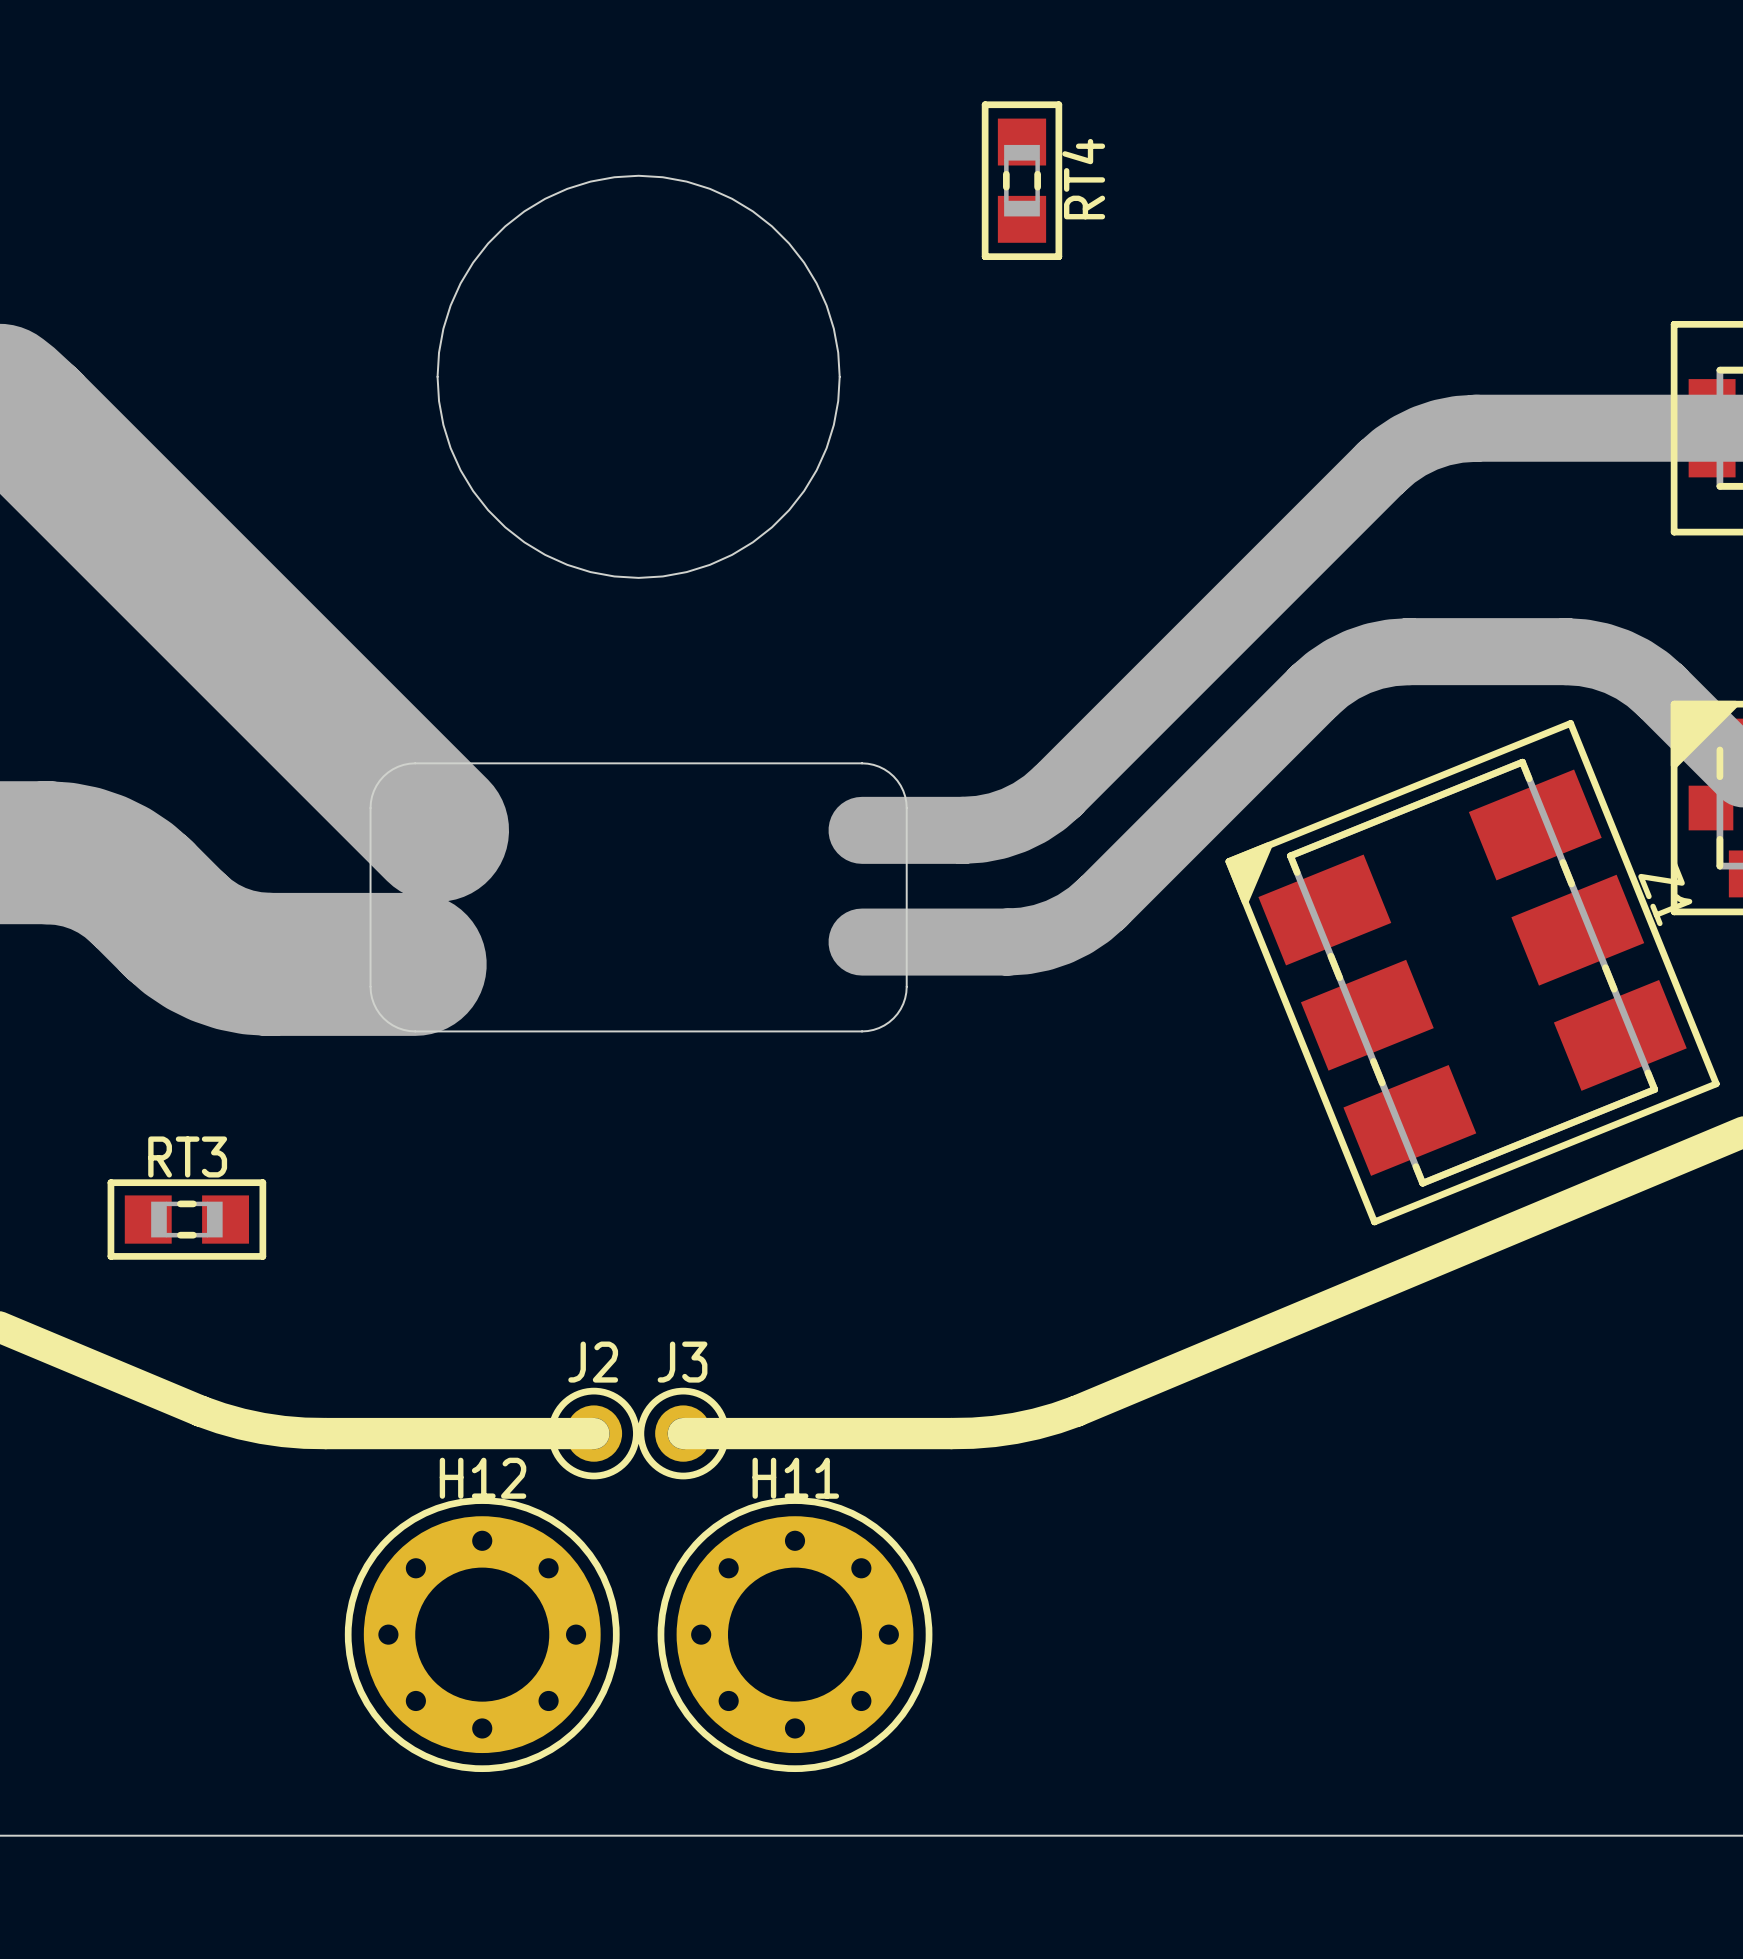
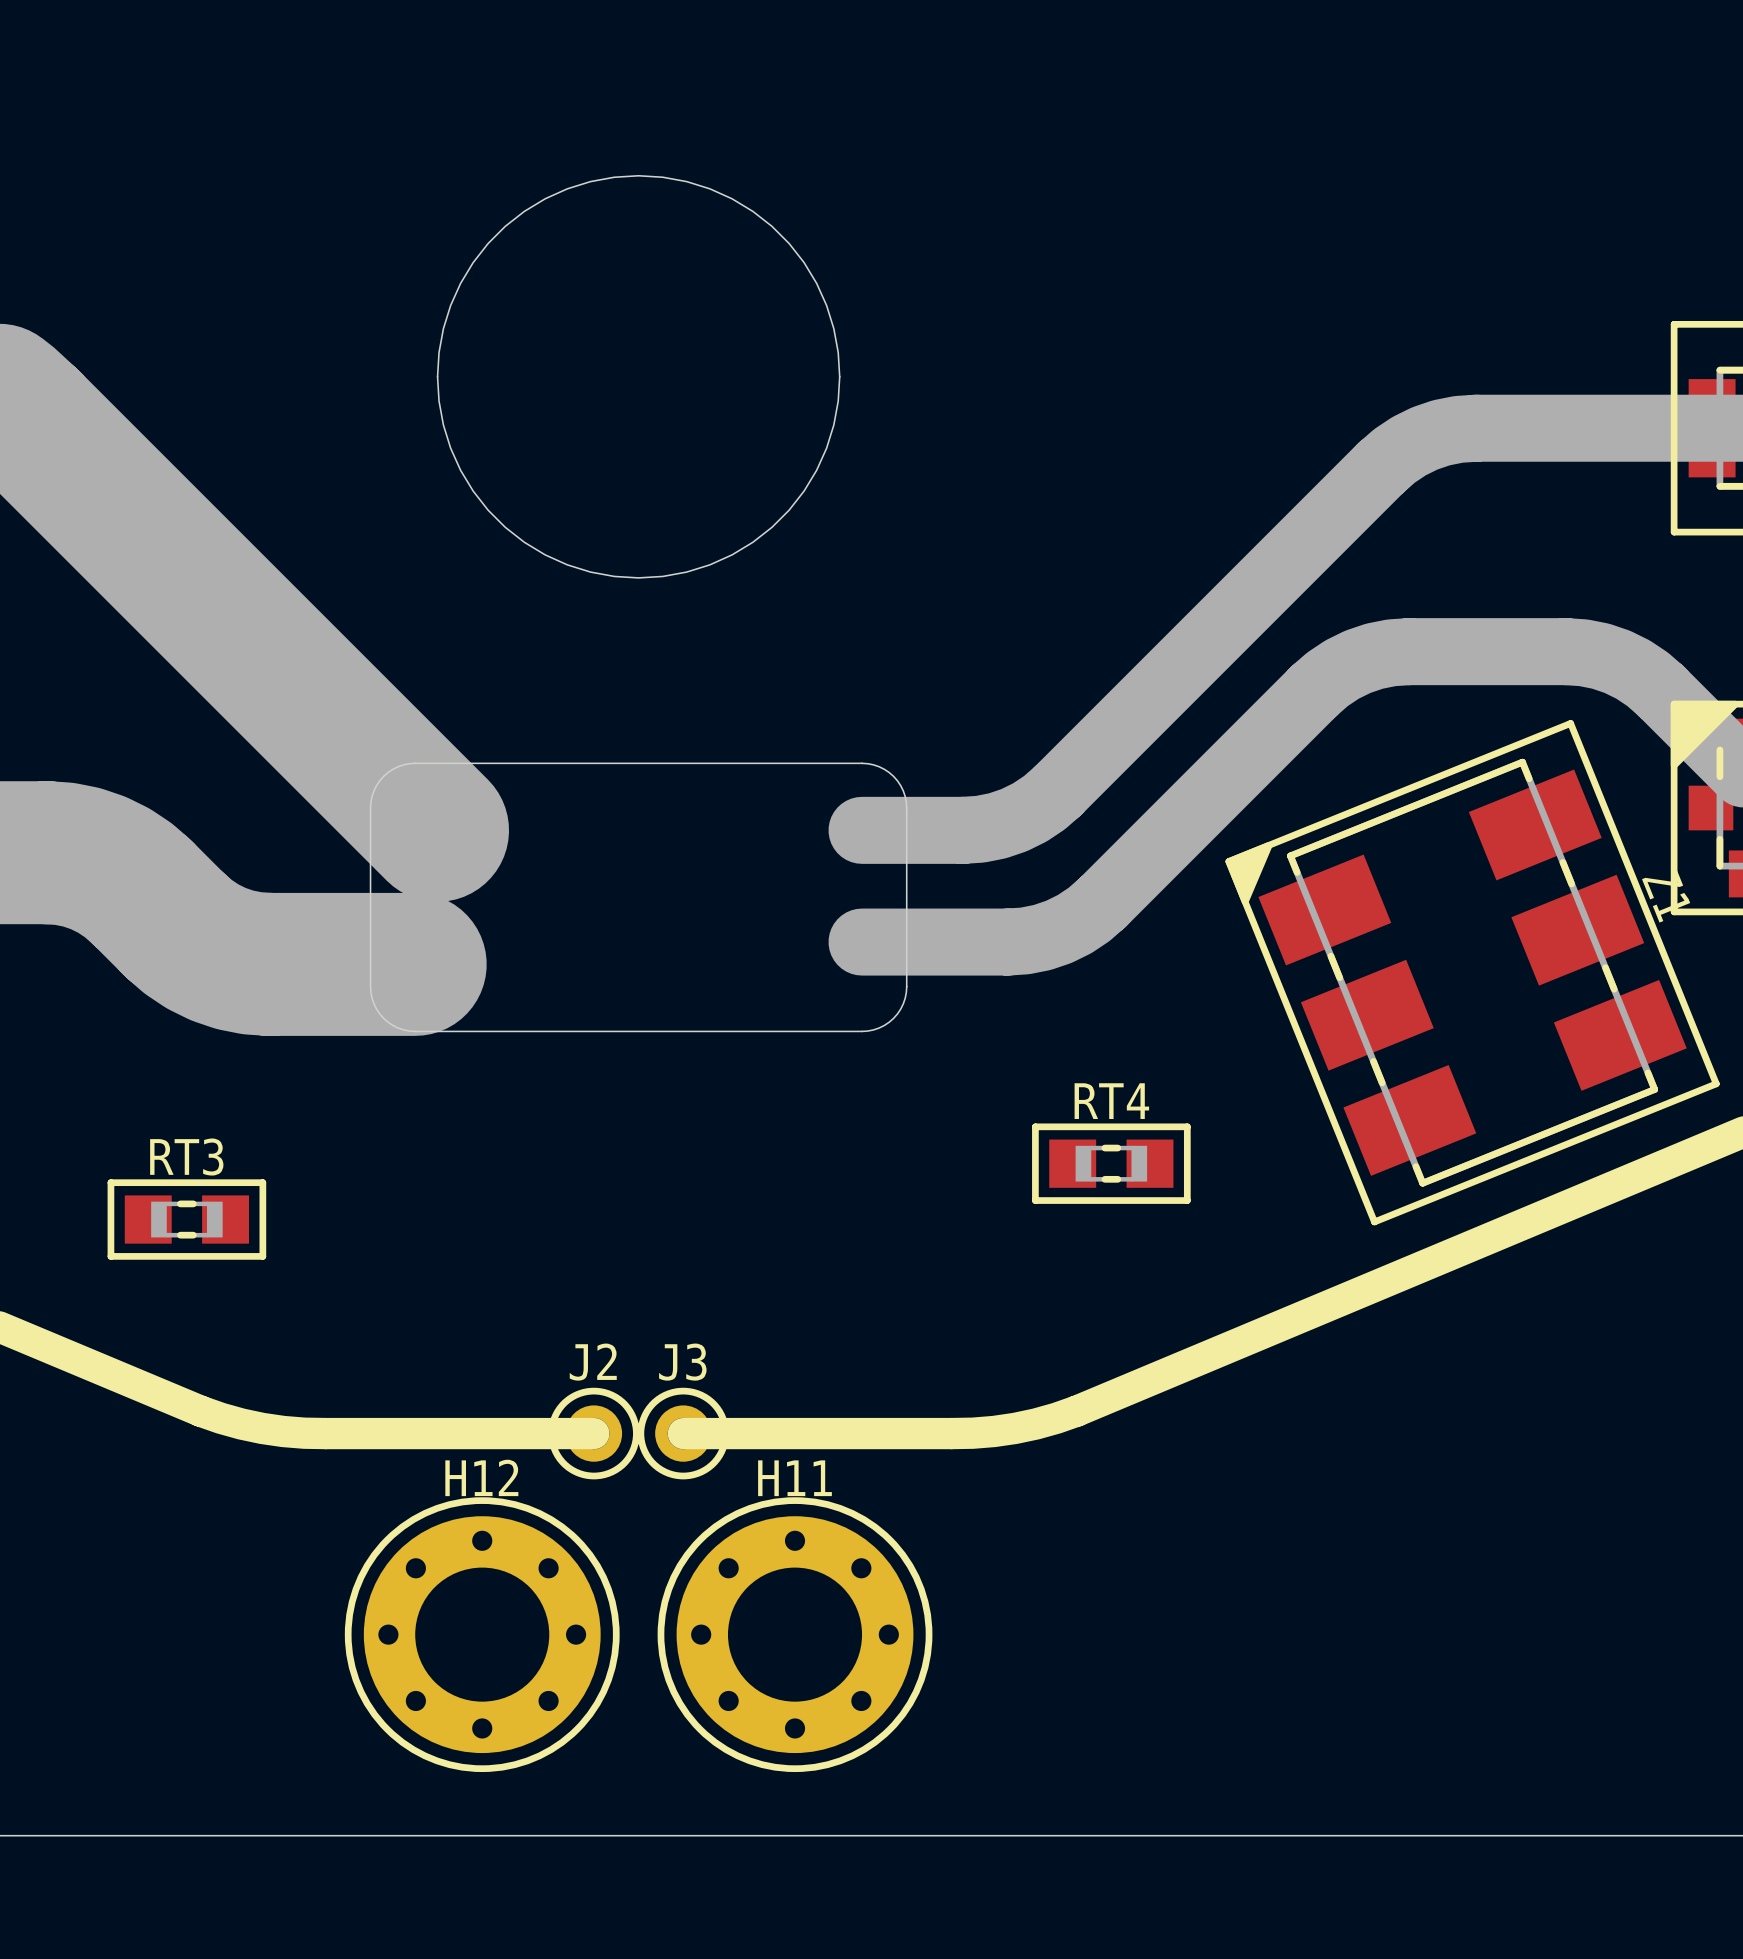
RT4 rotation: 0° (1021, 180) -> 90° clockwise (1111, 1163)
RT4 position: (1021, 180) -> (1111, 1163)

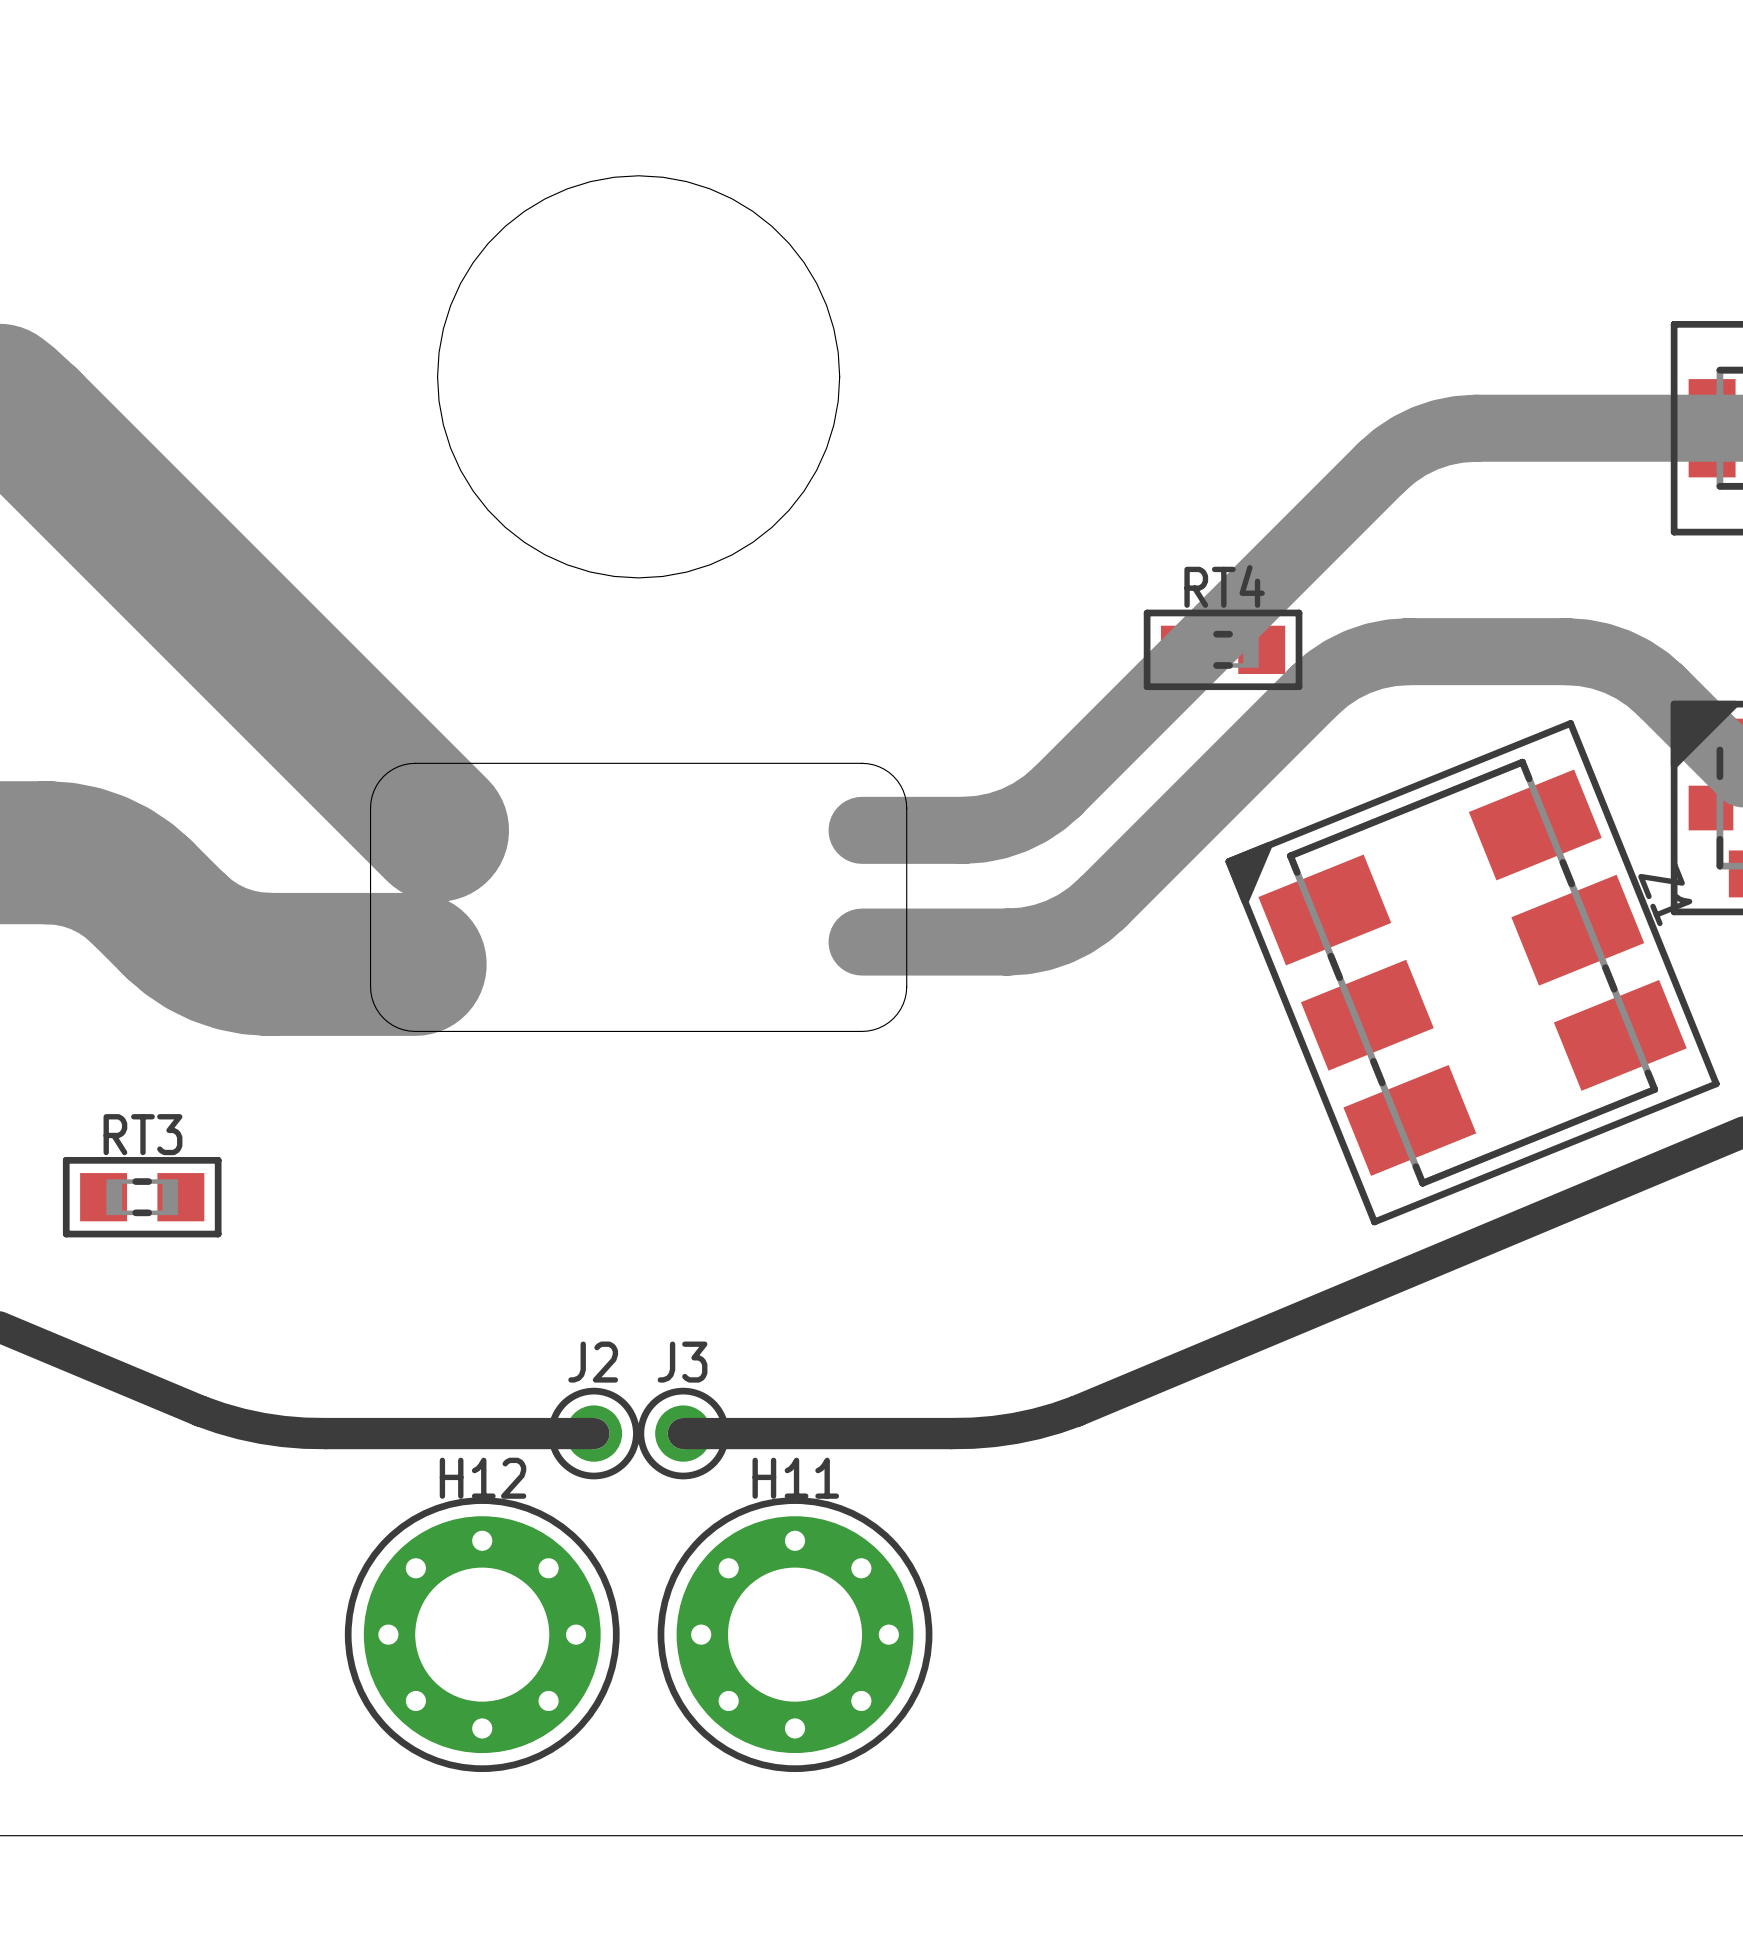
RT4 position: (1111, 1163) -> (1223, 649)
RT3 position: (186, 1219) -> (142, 1197)

